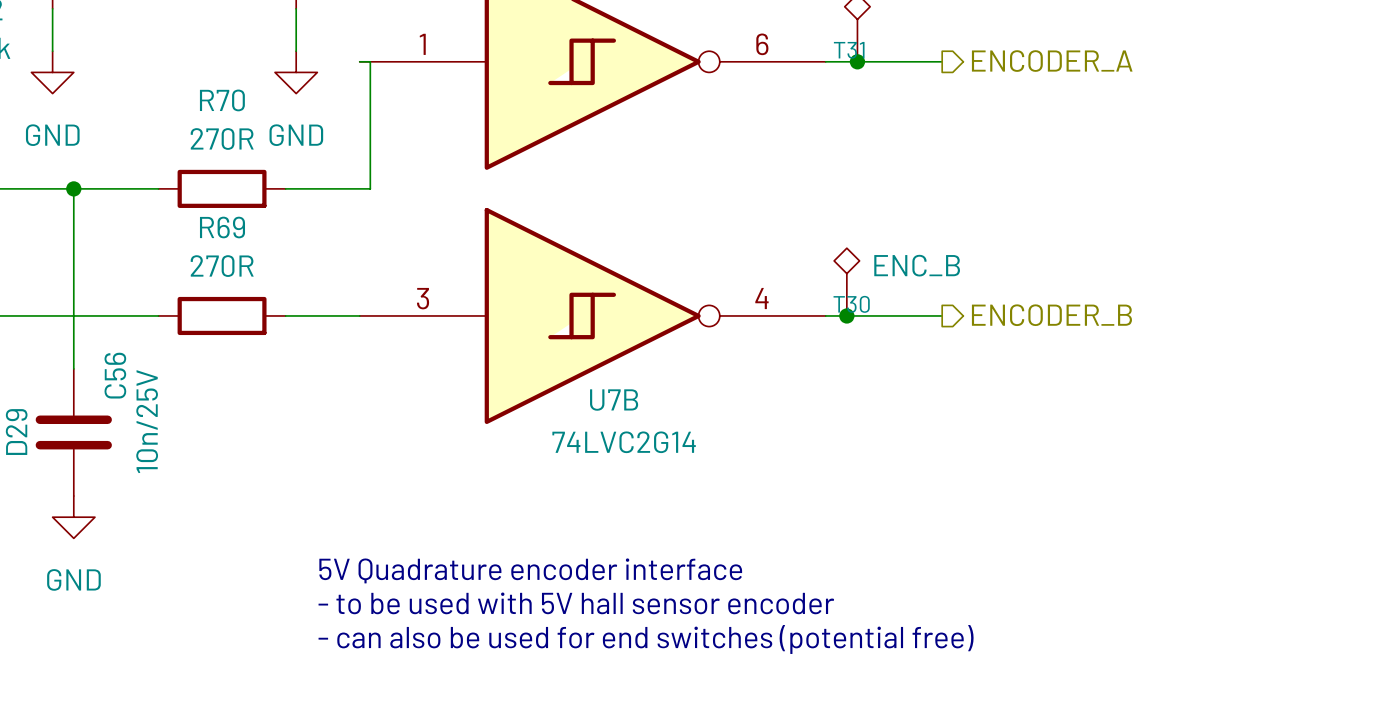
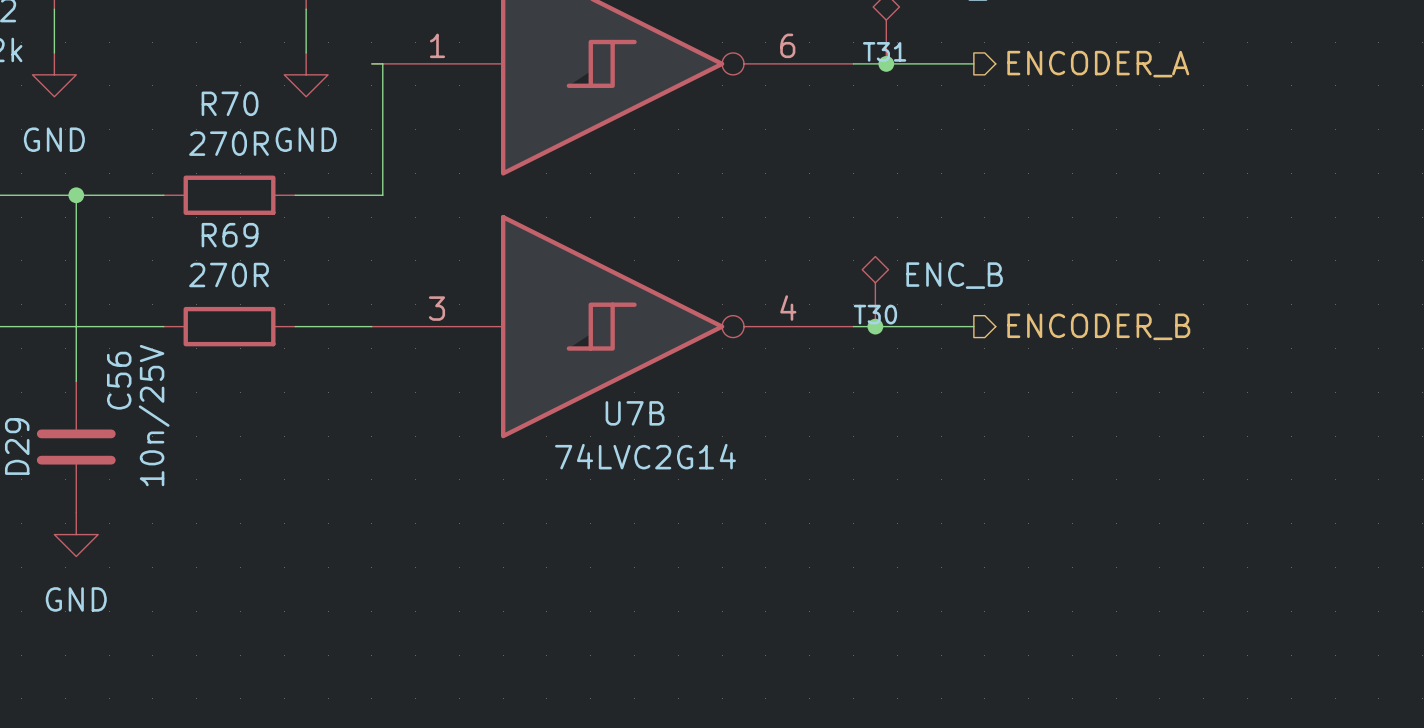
text: 5V Quadrature encoder interface (530, 570) -> none
text: - to be used with 5V hall sensor encoder (576, 603) -> none
text: - can also be used for end switches (potential free) (646, 639) -> none

